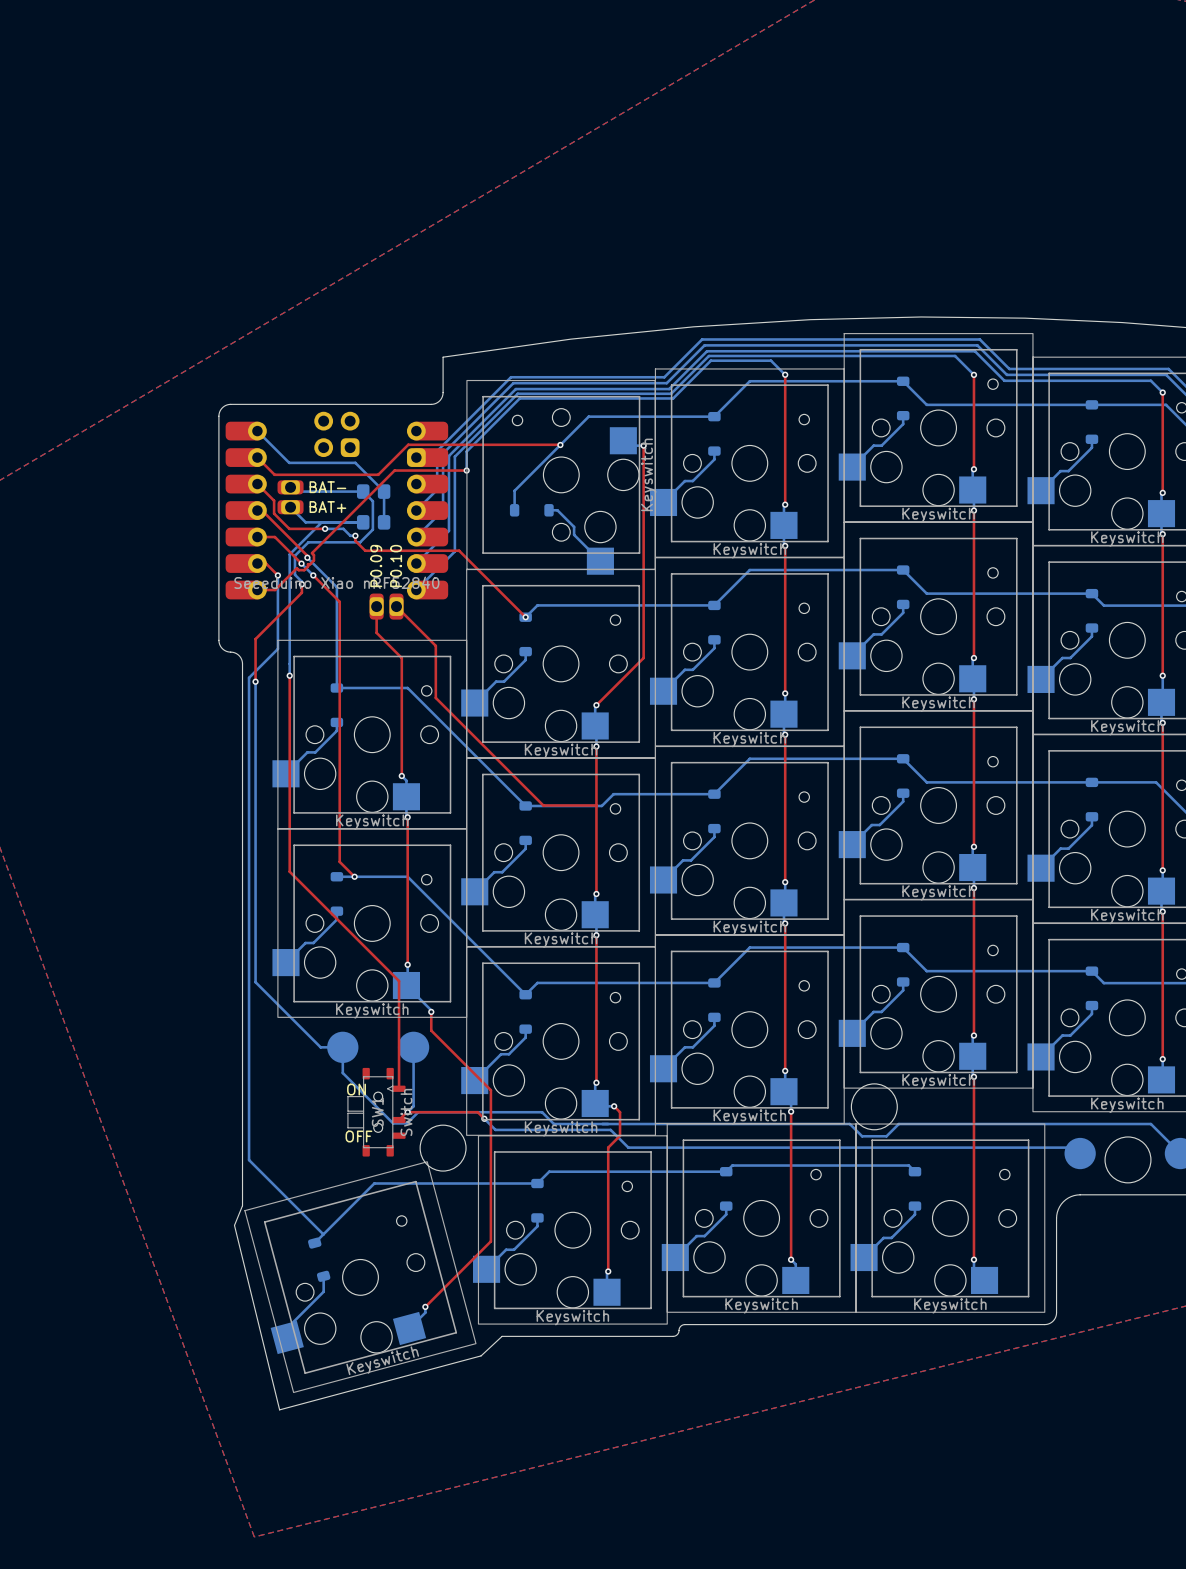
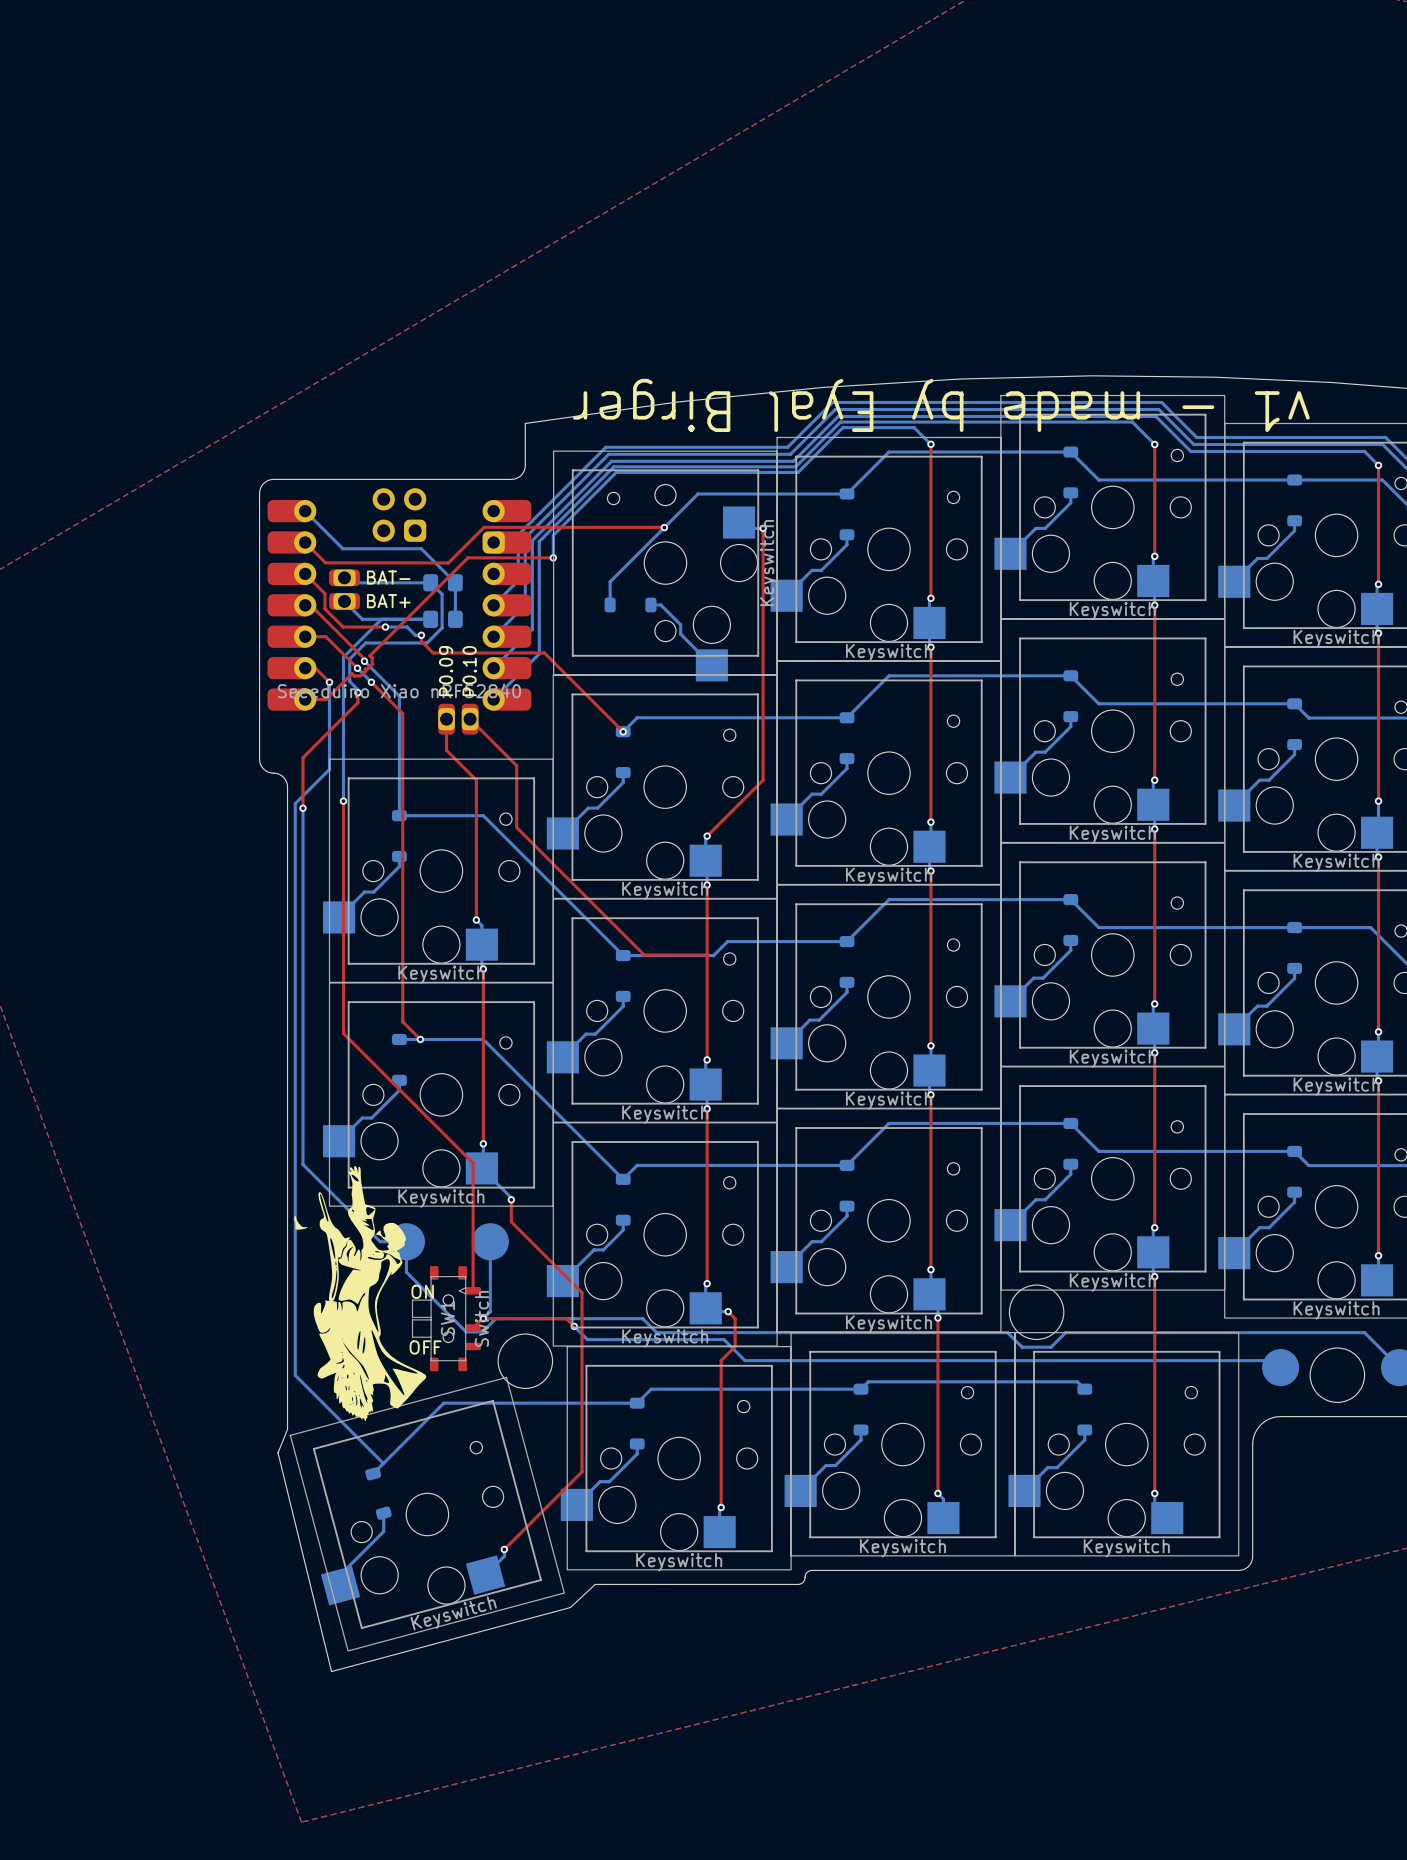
text: none -> v1 - made by Eyal Birger (941, 405)
drawing: none -> [294, 1166, 427, 1422]

